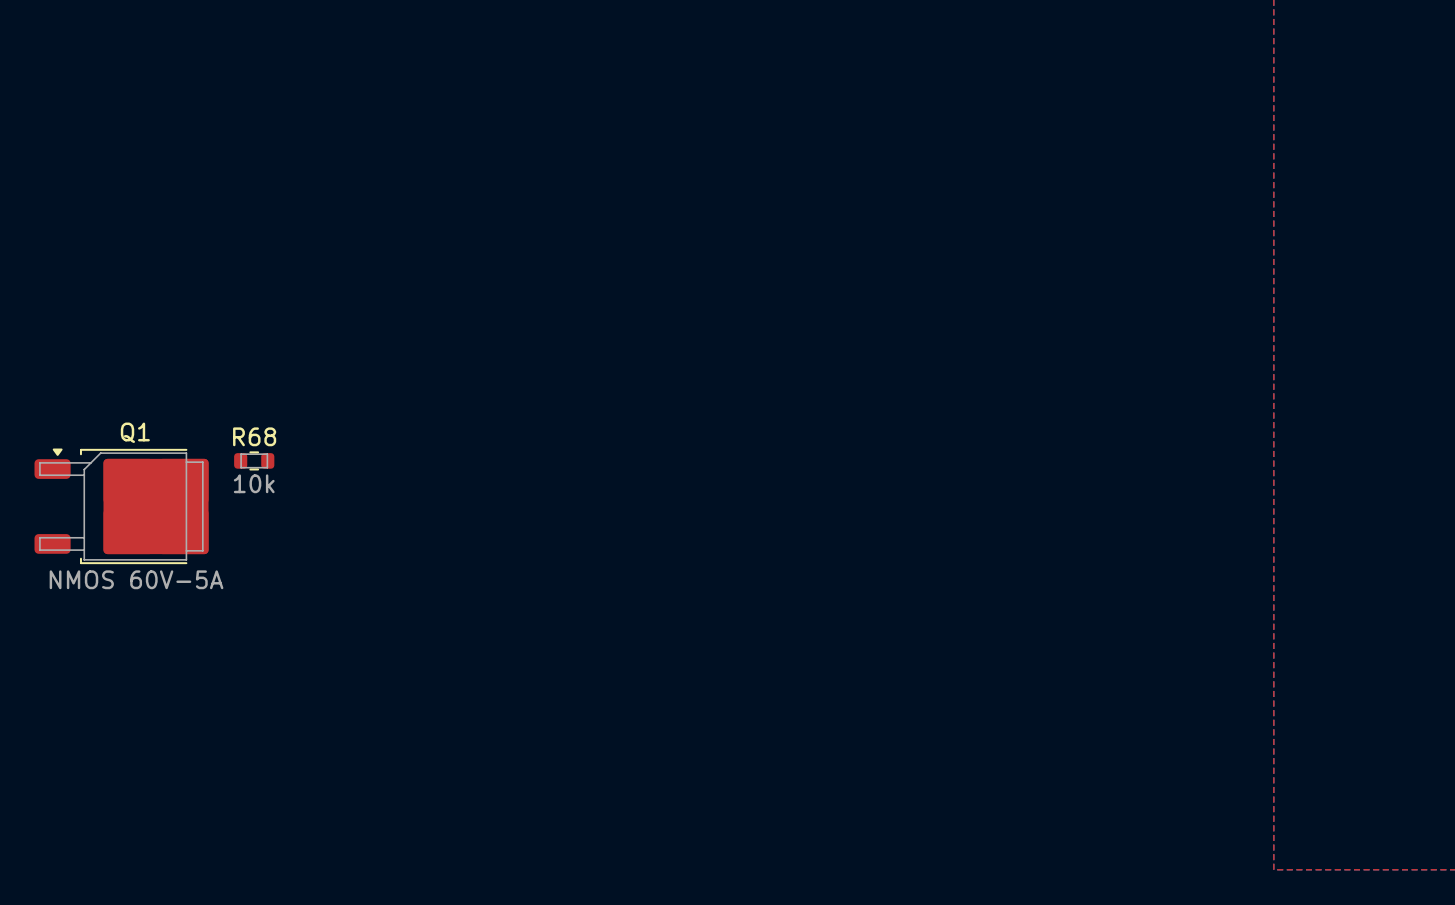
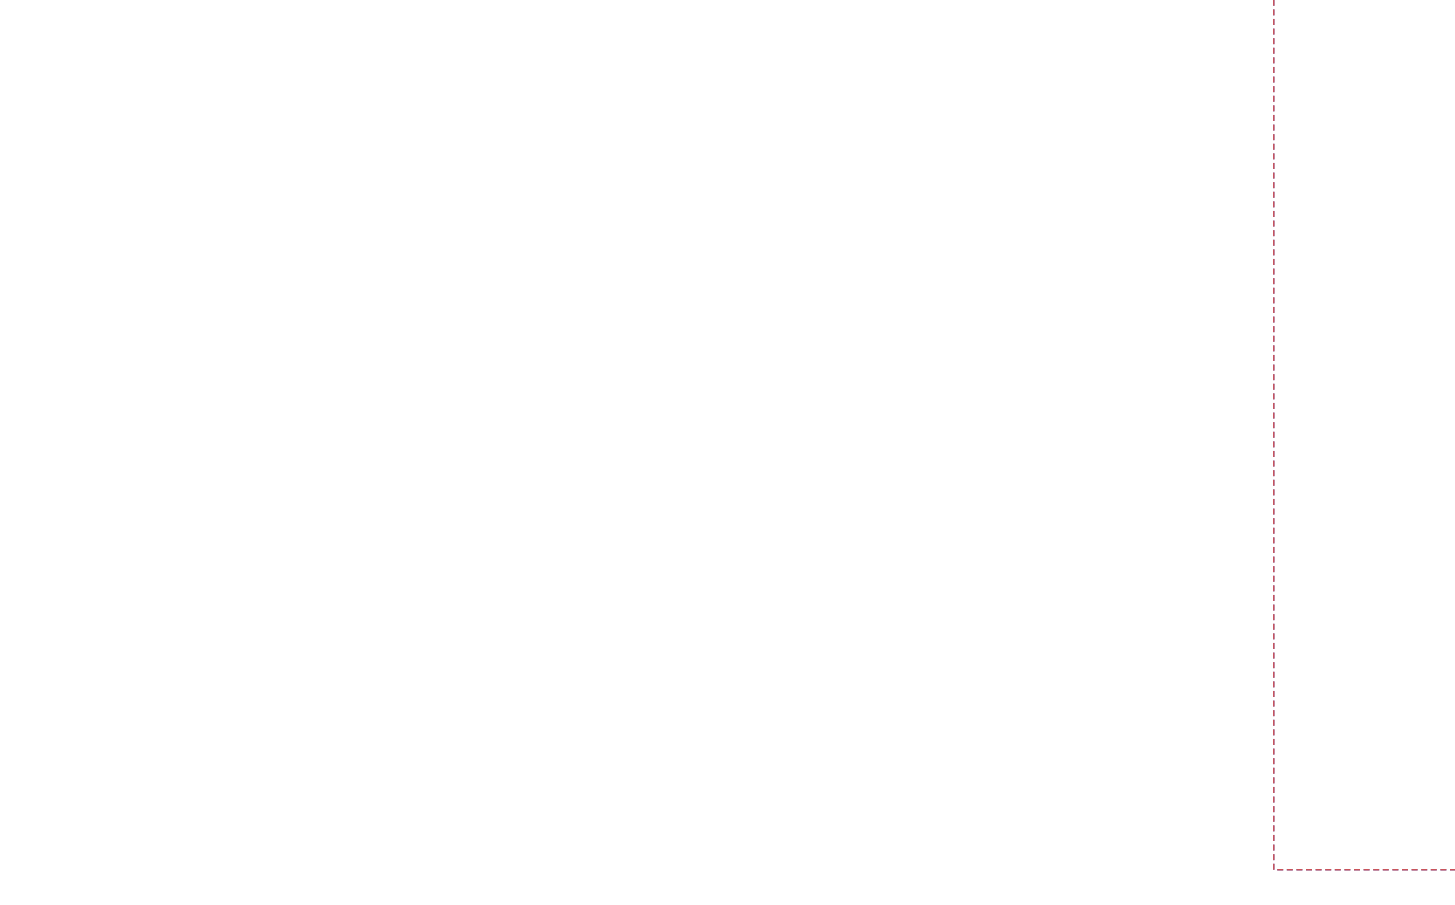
R68: 10k (254, 460) -> none
Q1: NMOS 60V-5A (121, 506) -> none

